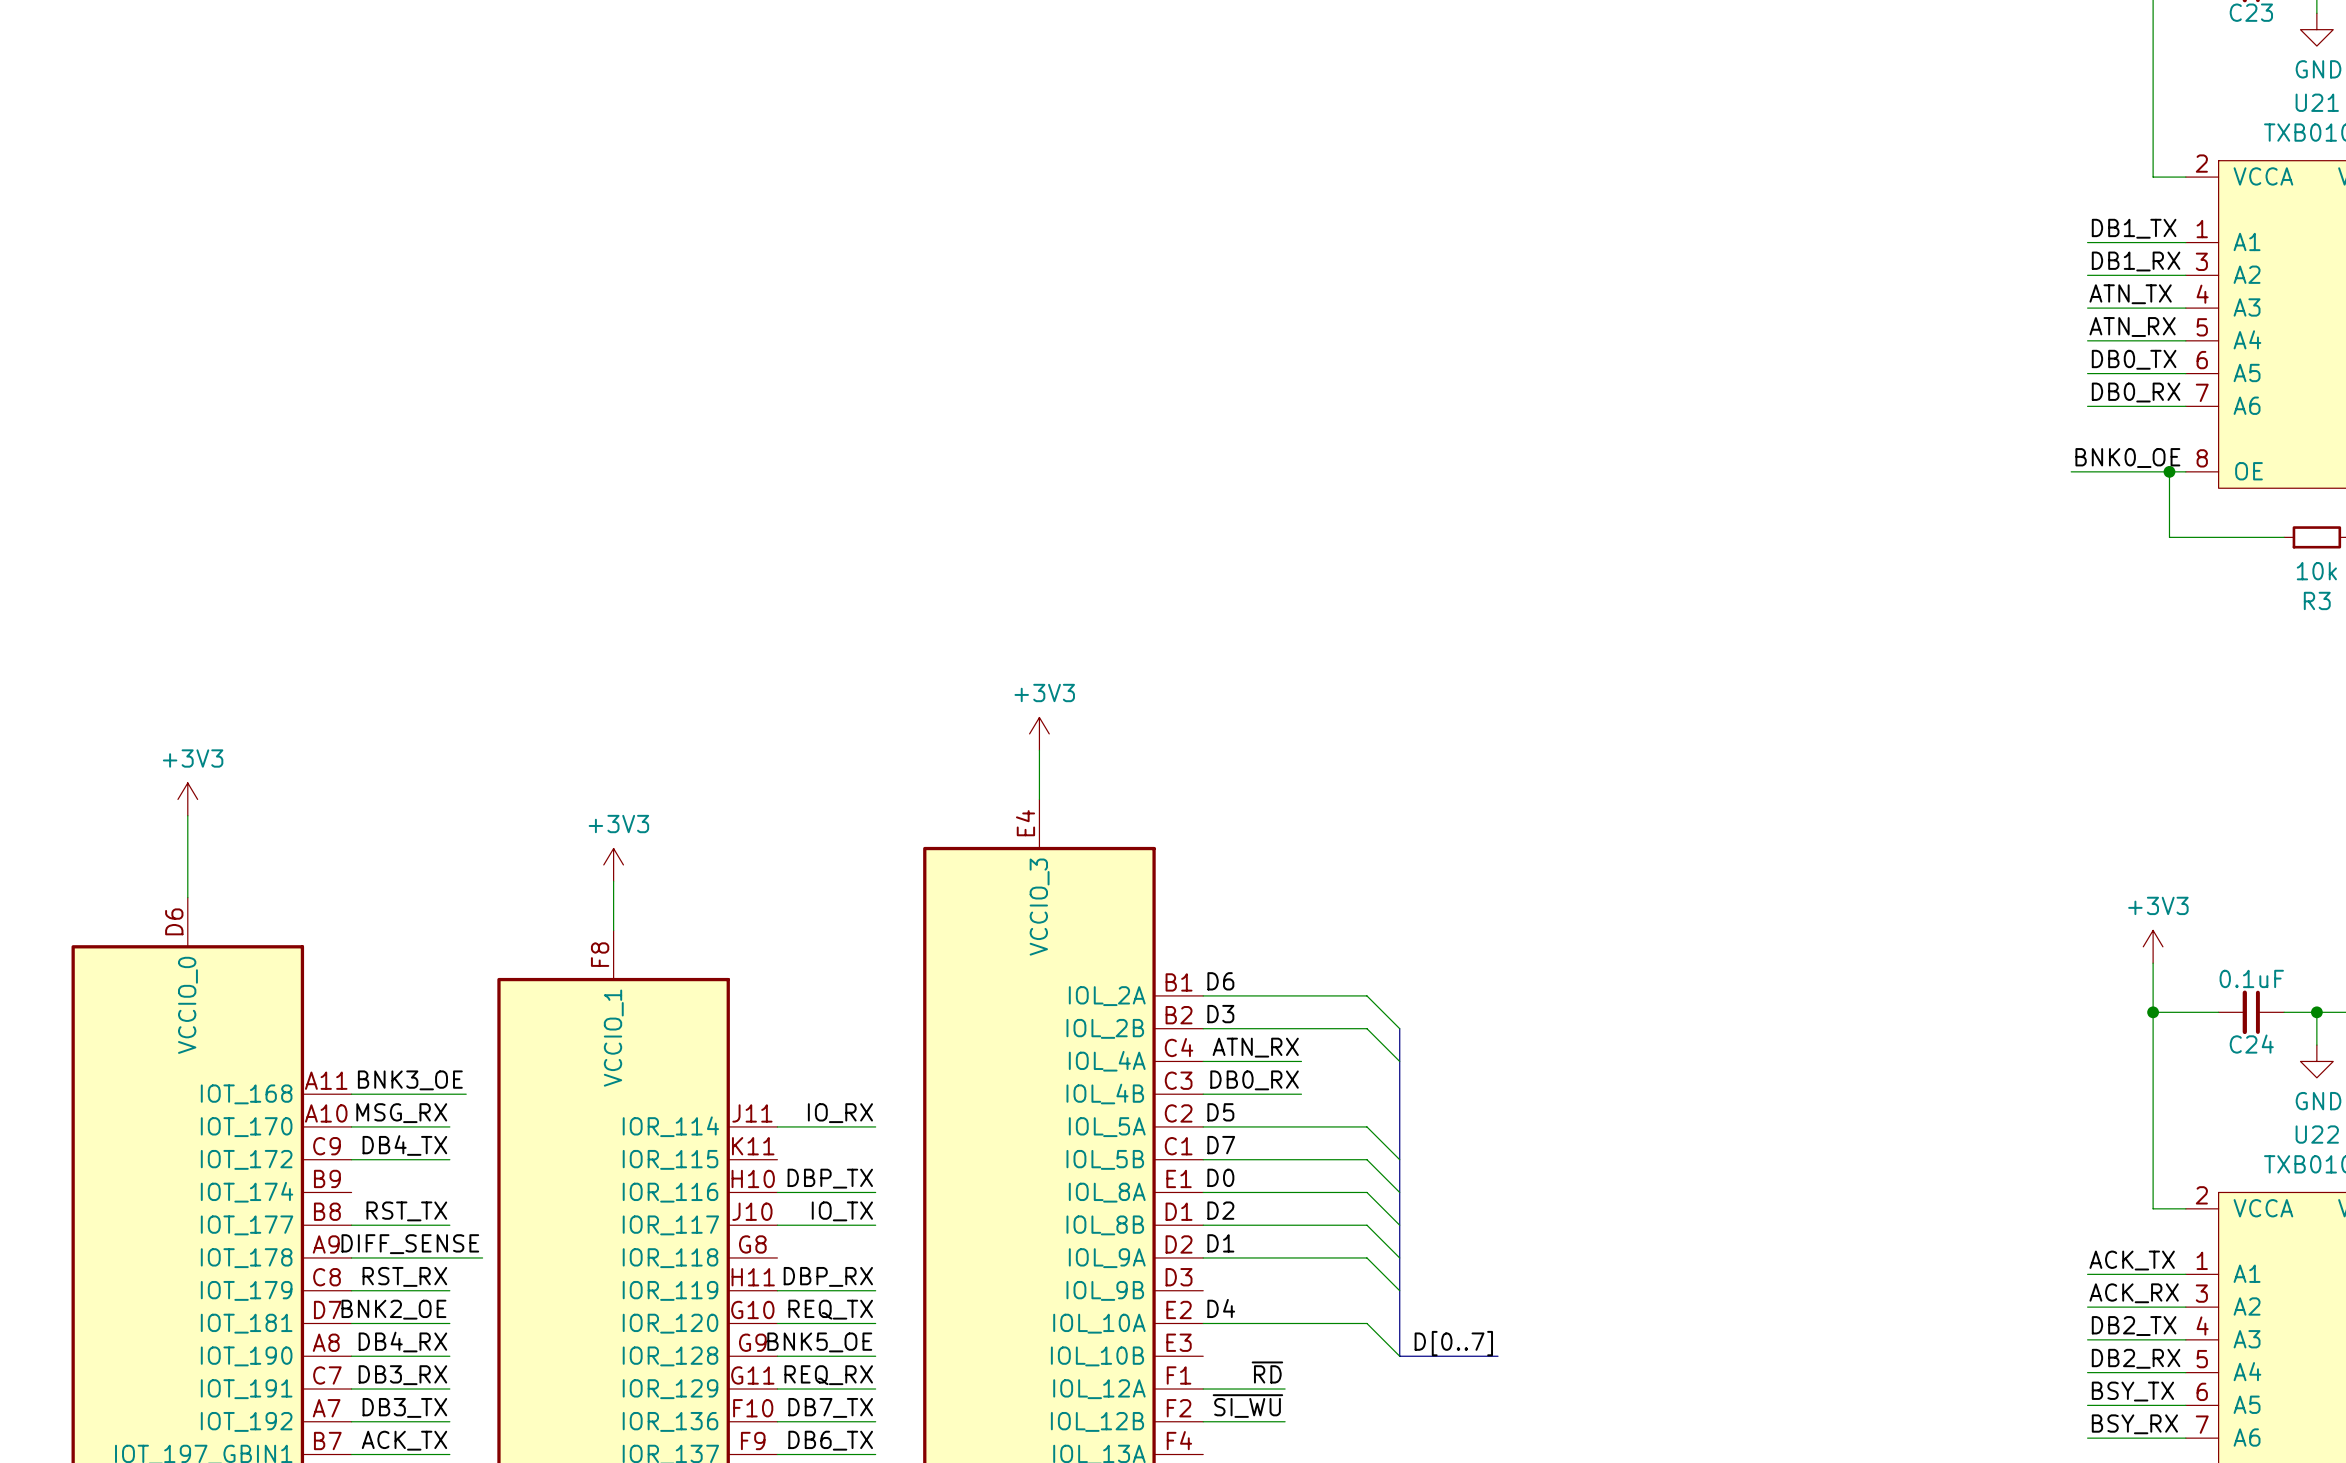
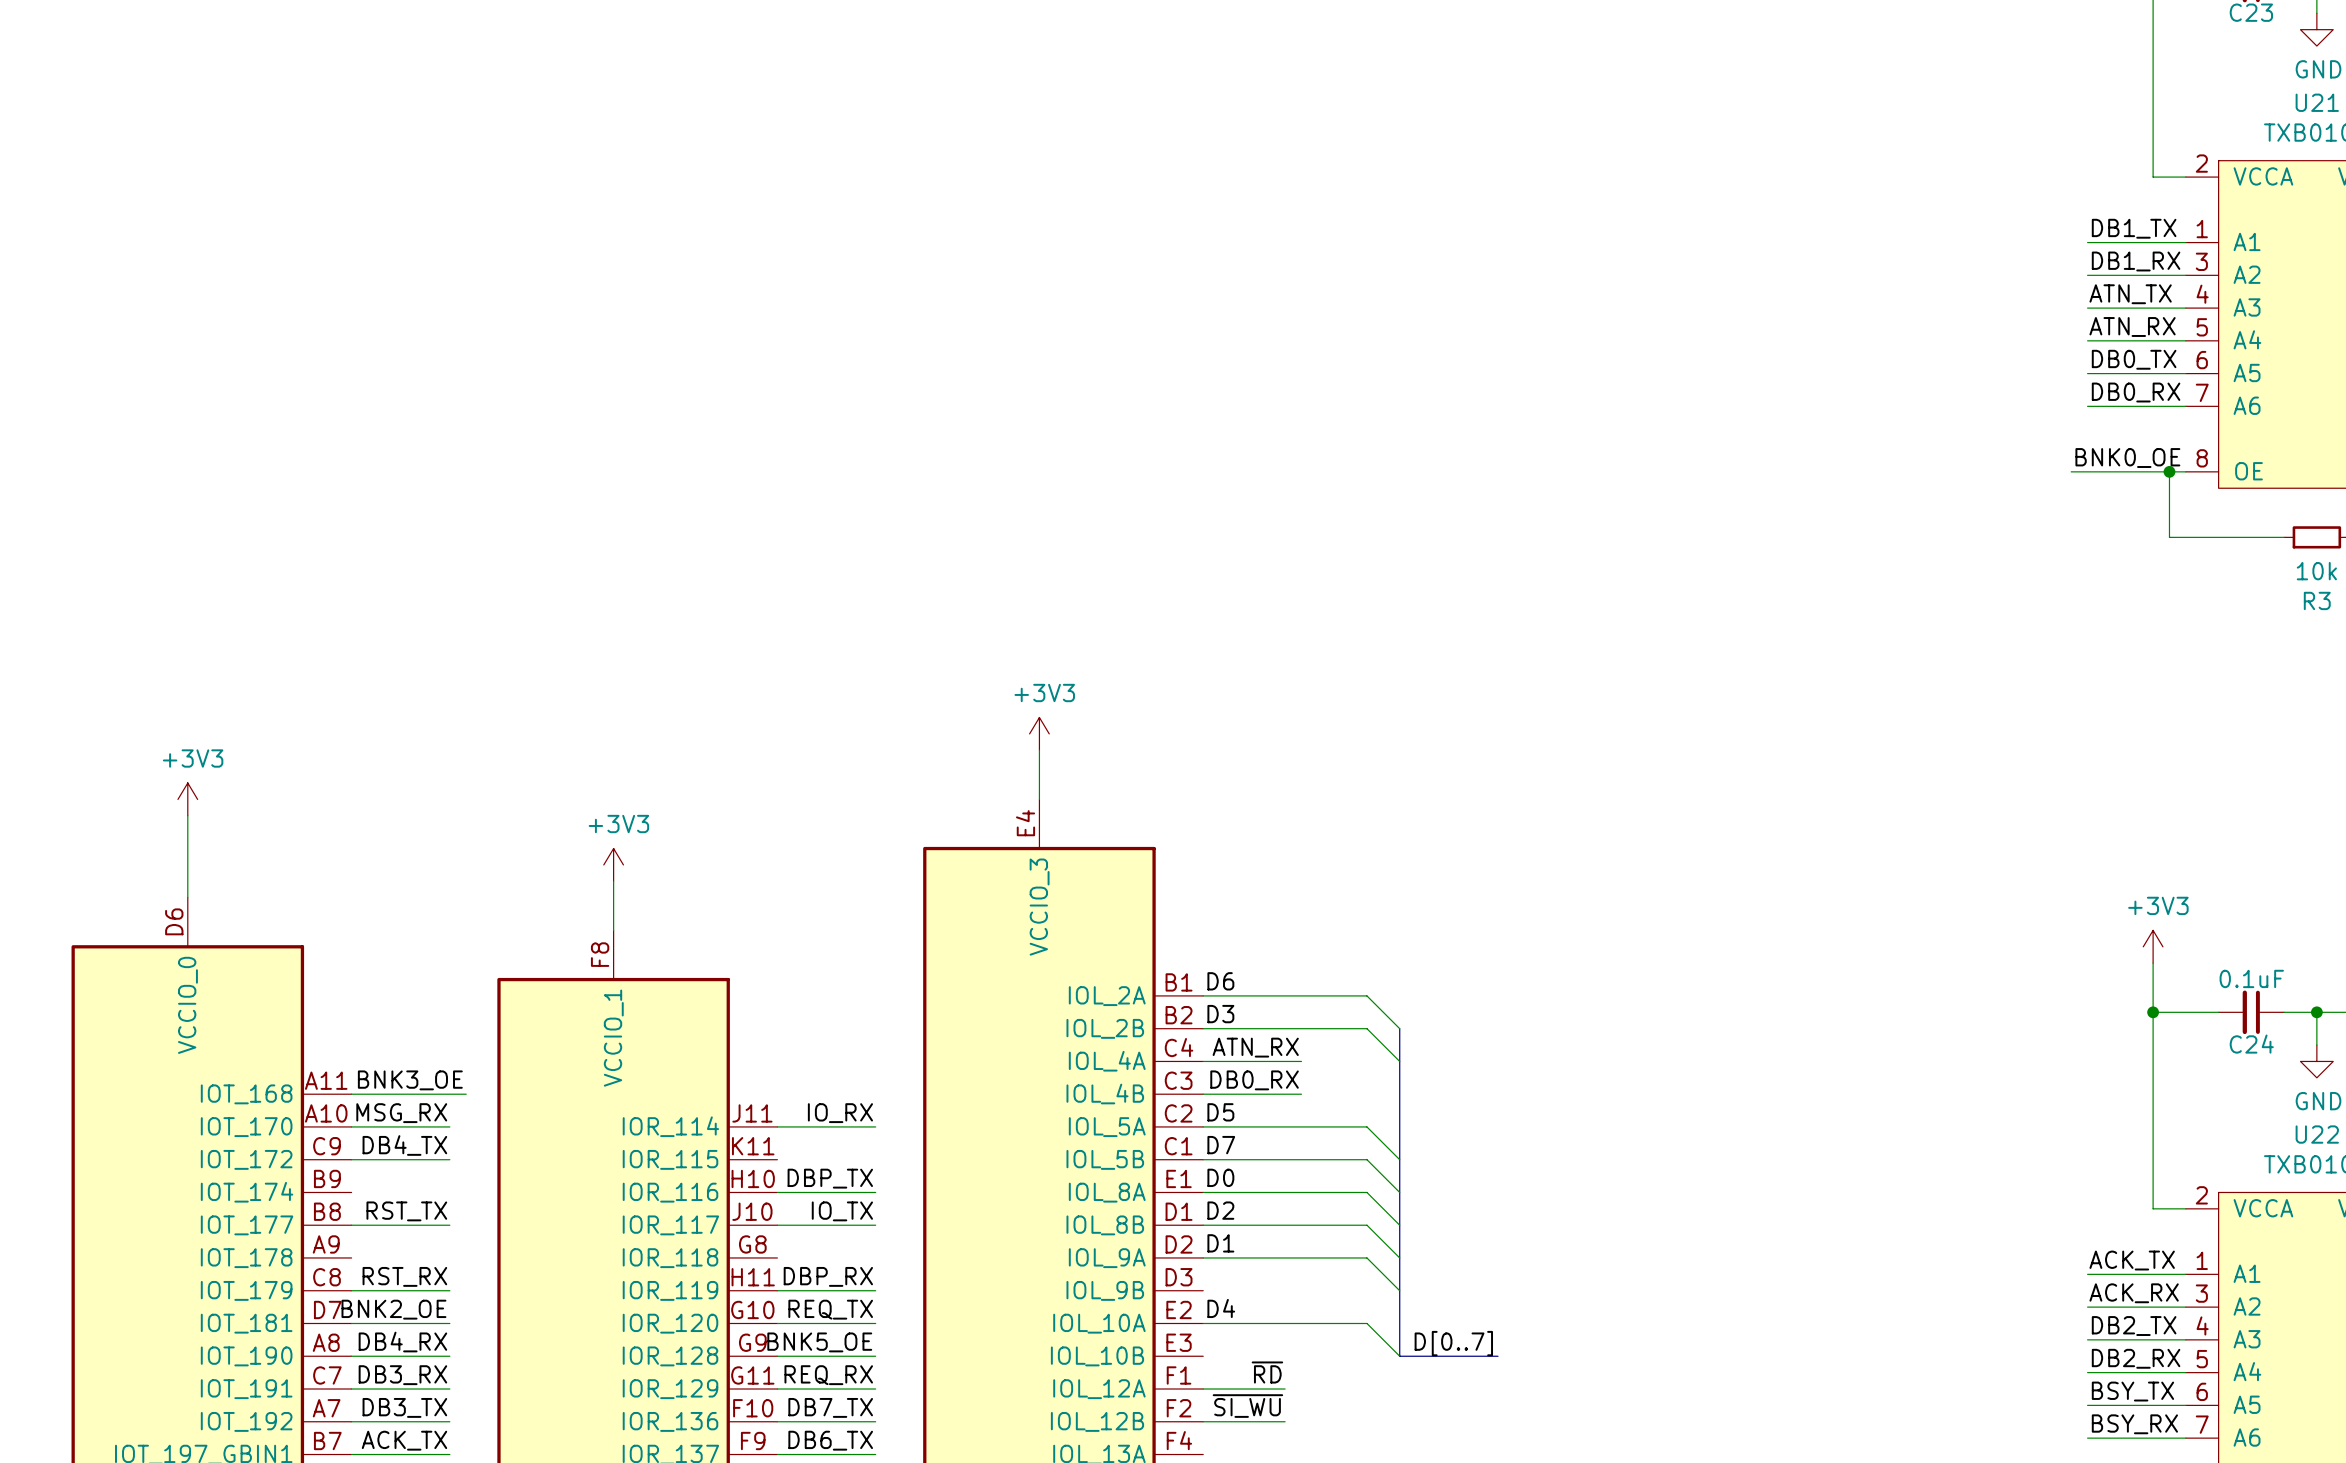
label: DIFF_SENSE (410, 1244) -> none
wire: (351, 1257) (482, 1257) -> none

